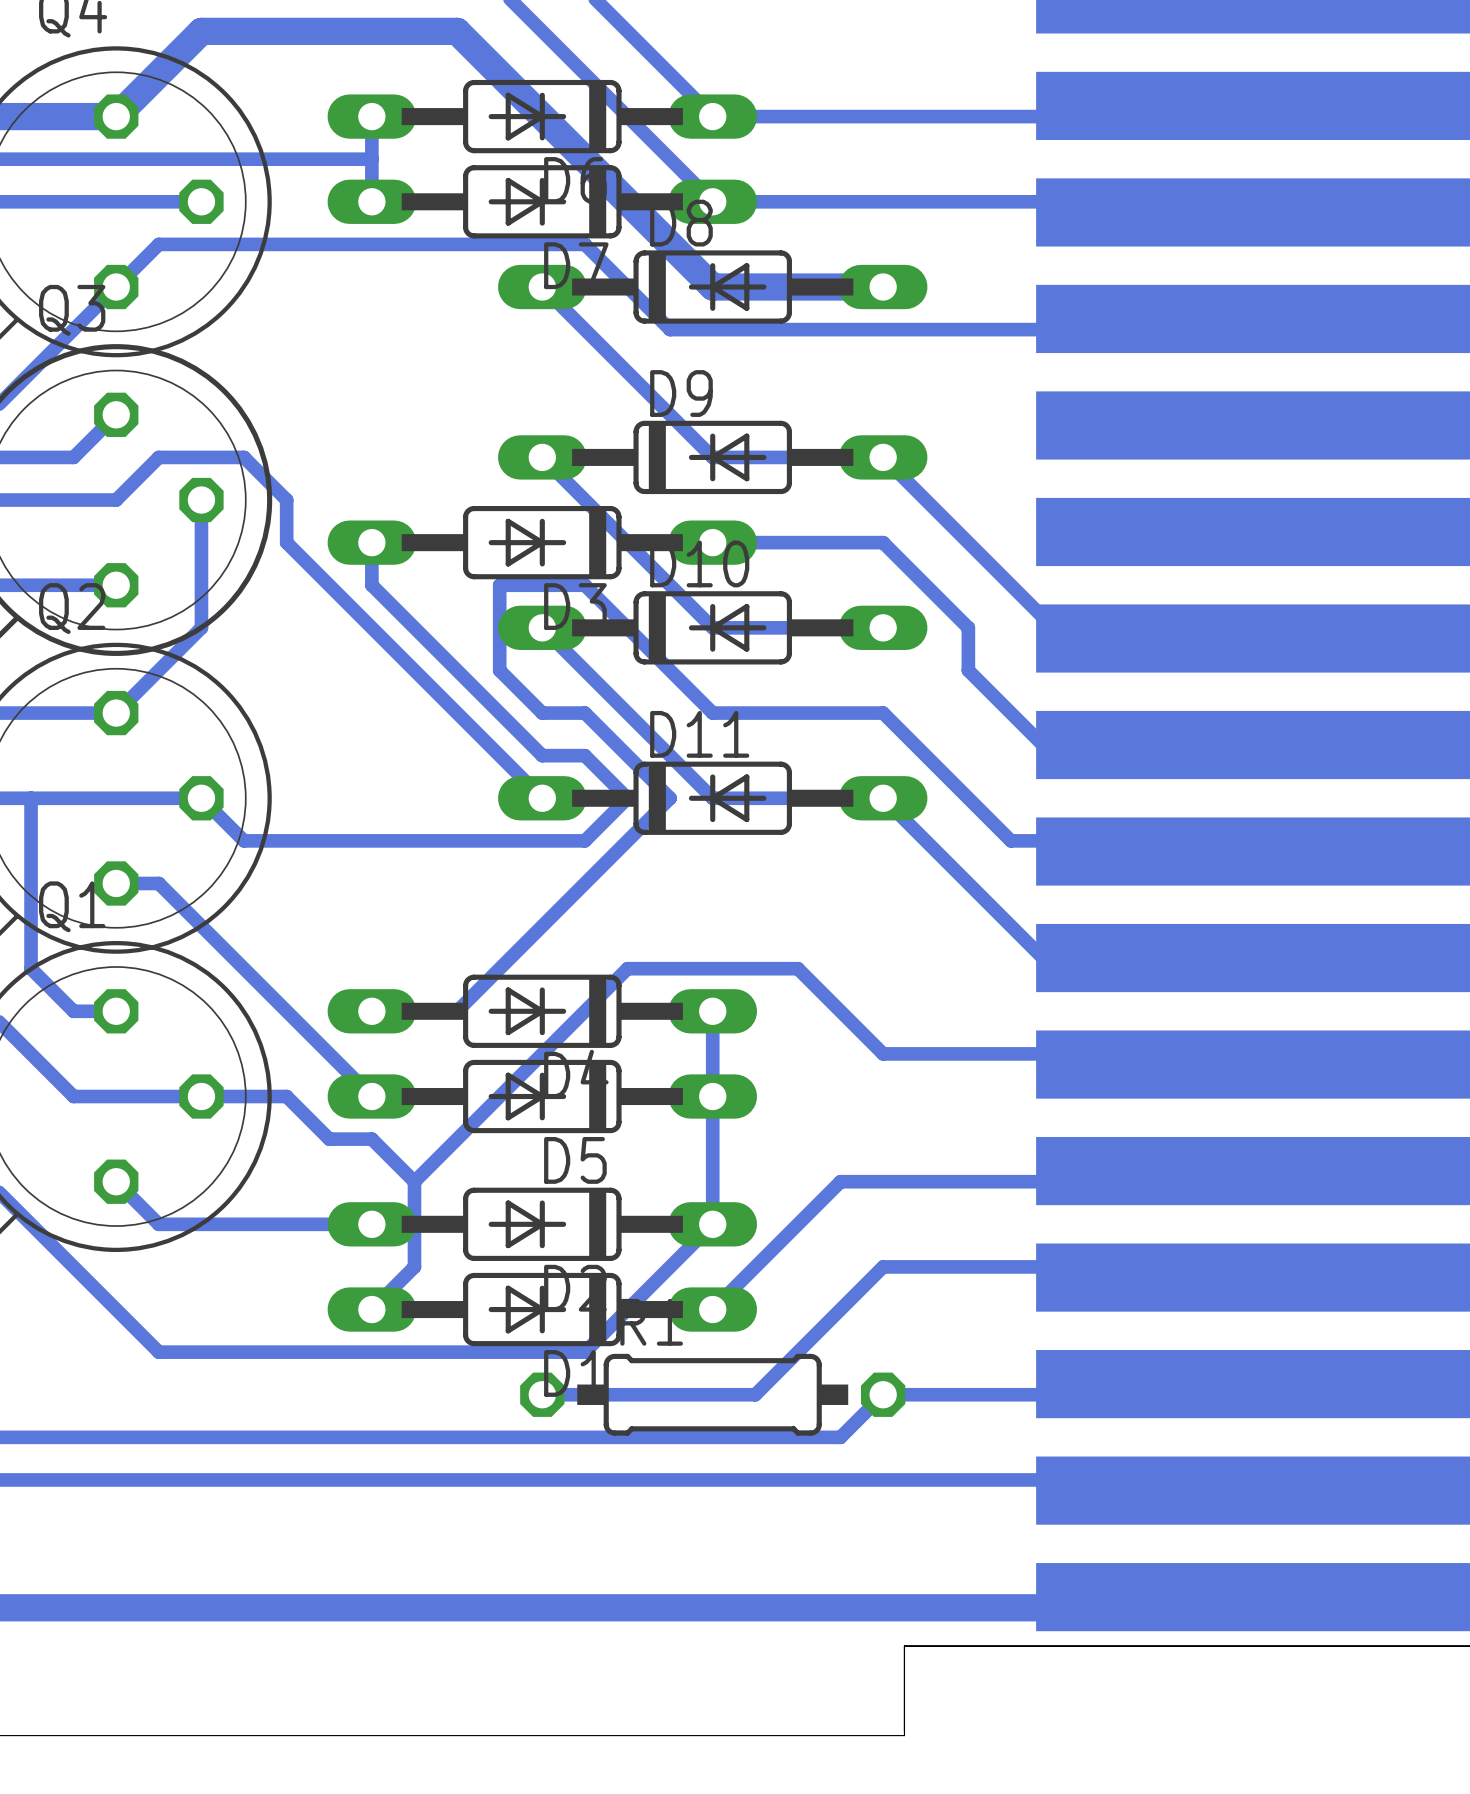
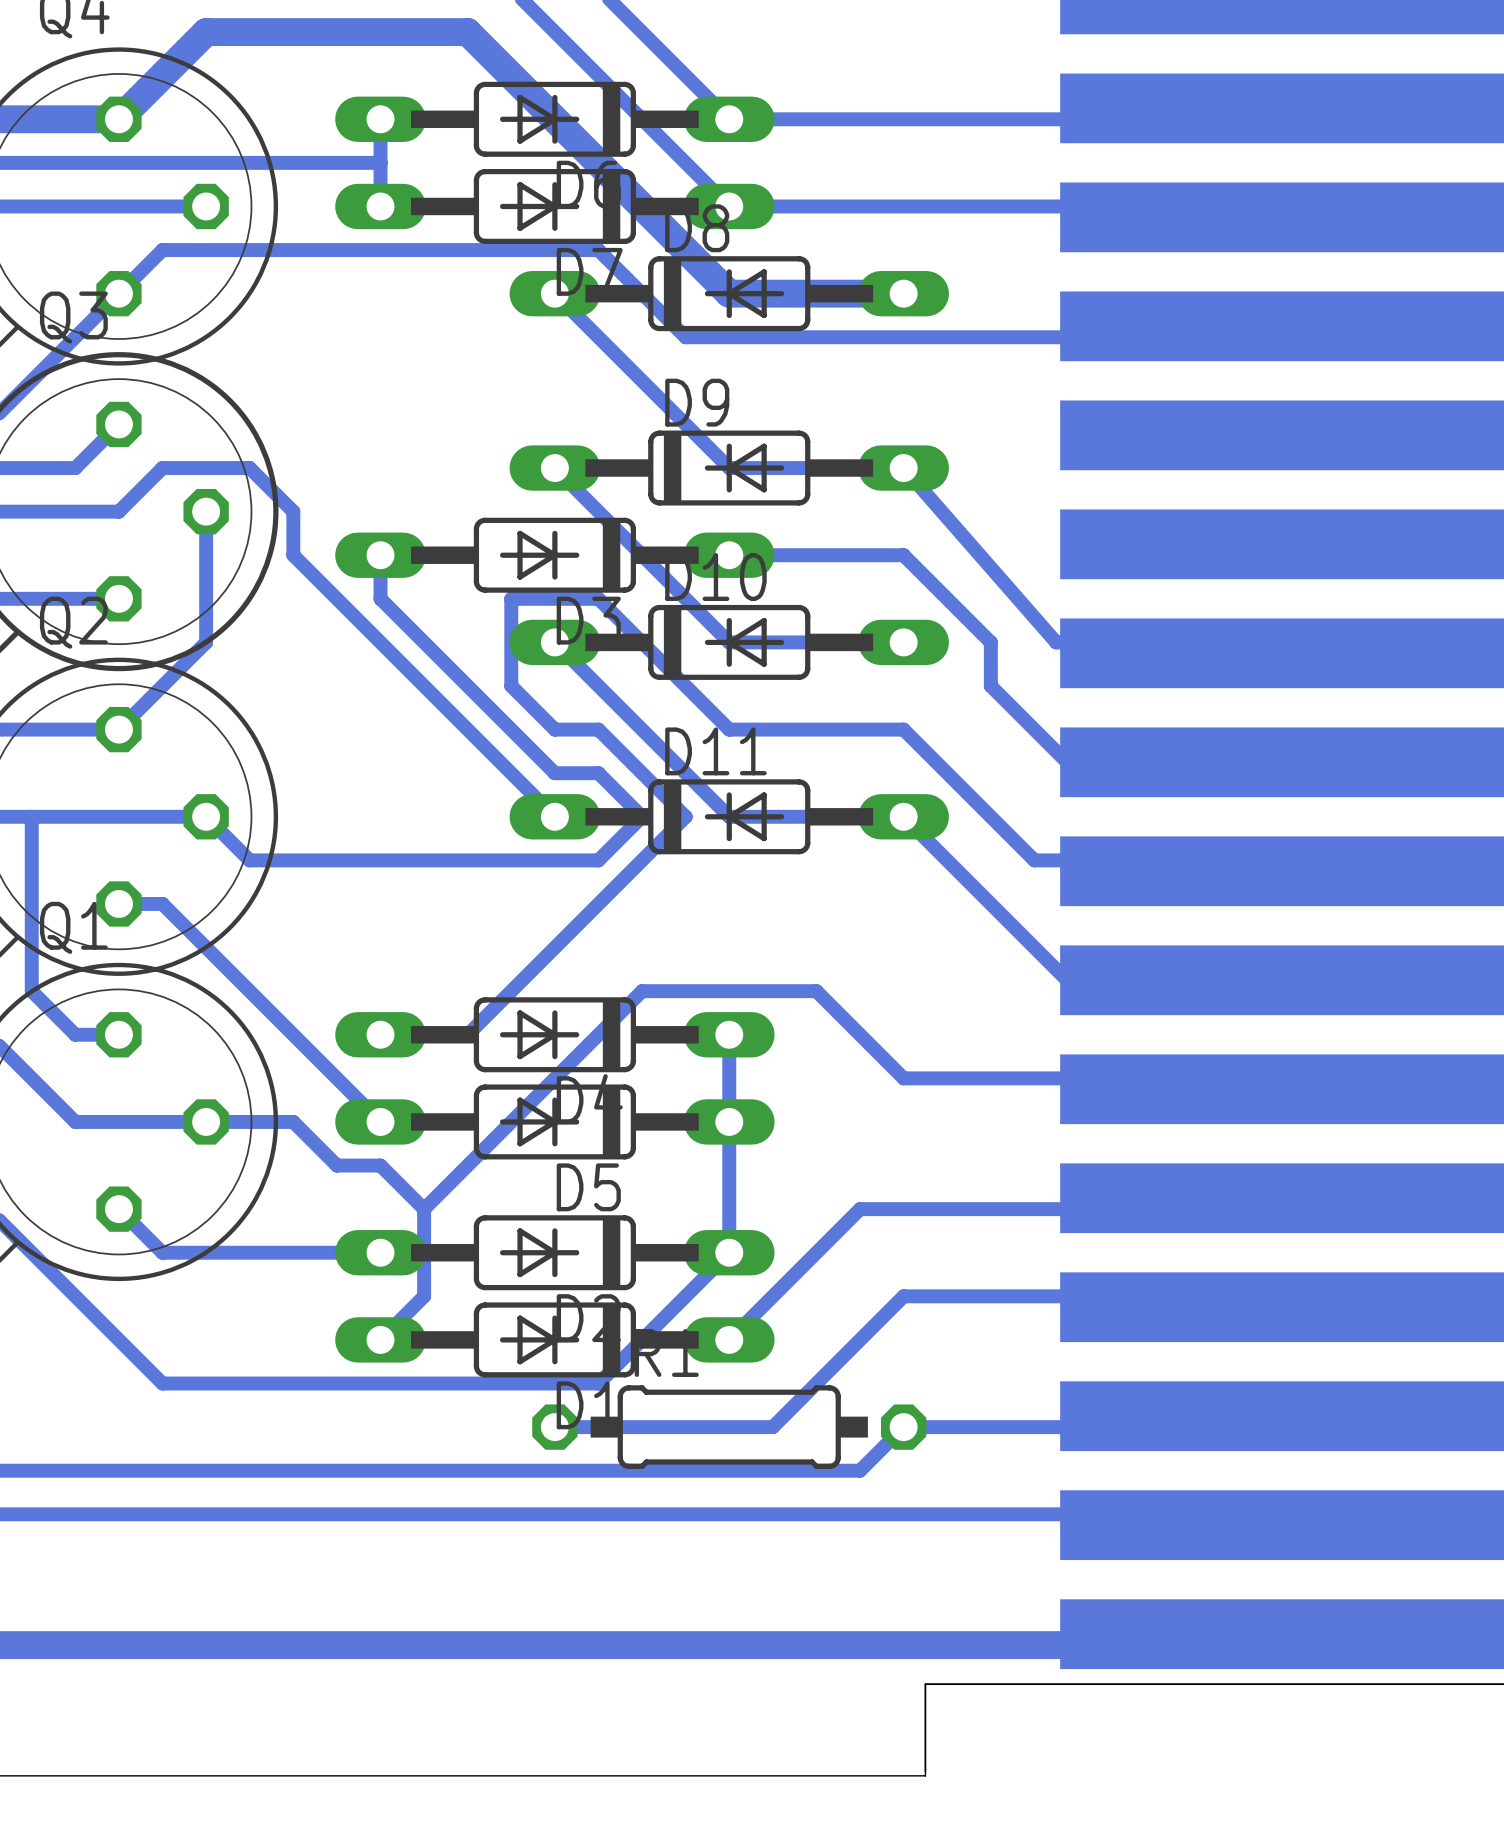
bottom track: (883, 457) (1053, 627) -> (903, 468) (1056, 642) (1078, 642)

